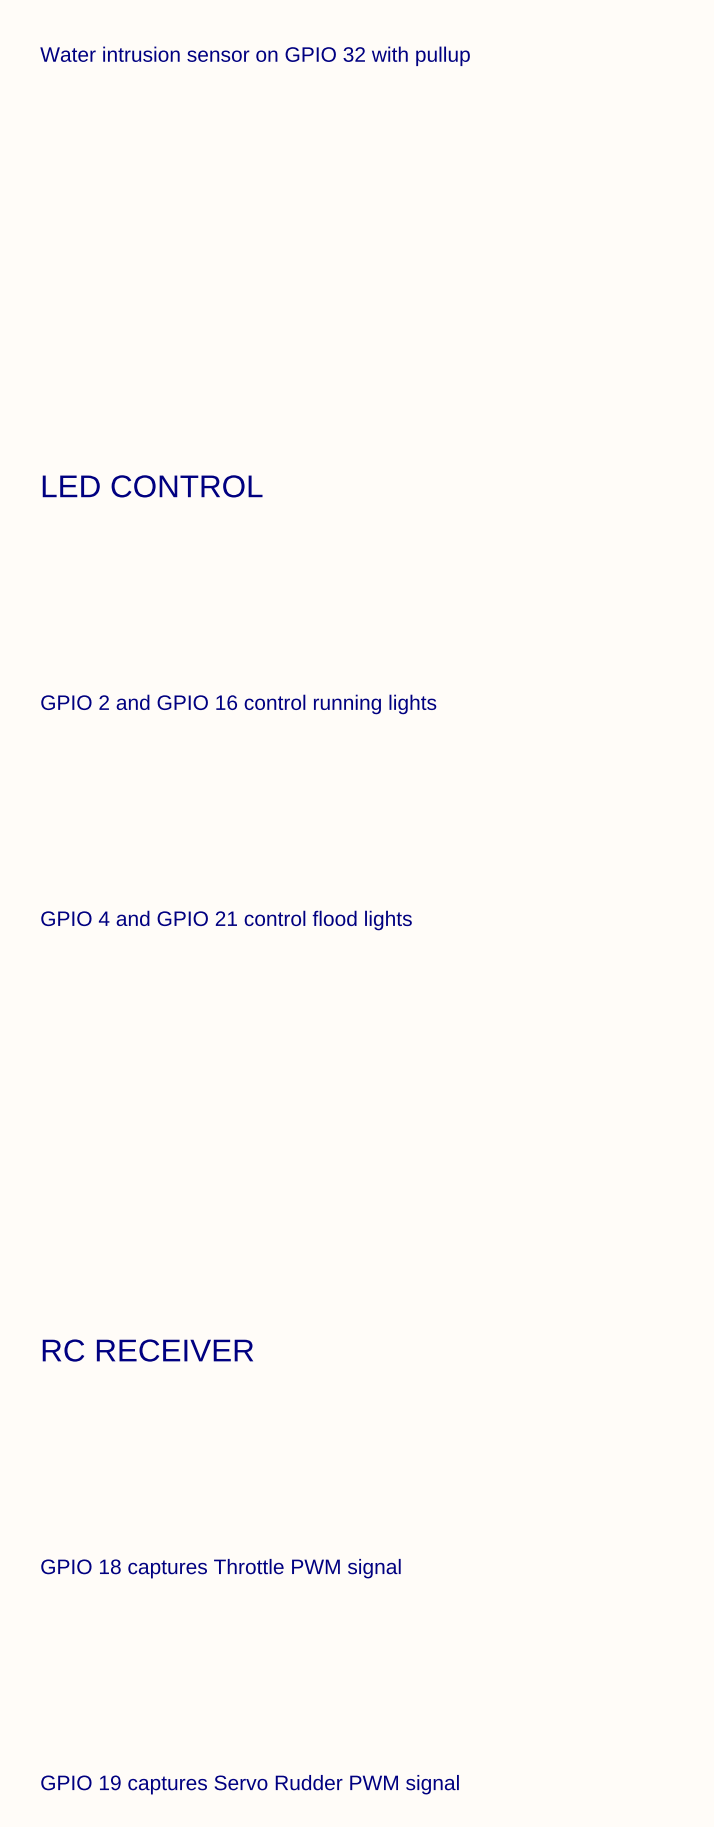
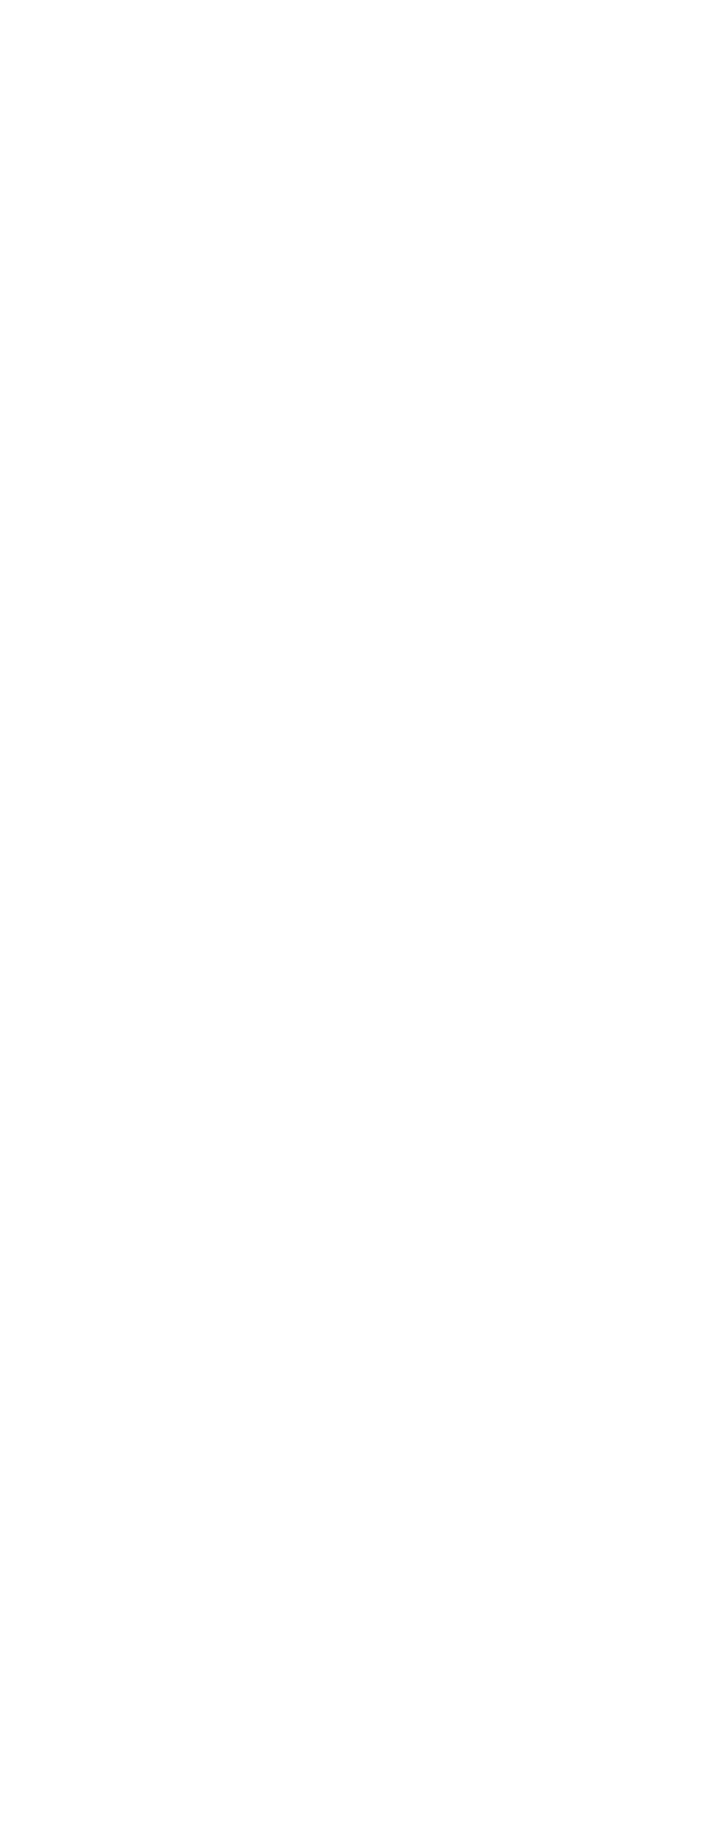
text: Water intrusion sensor on GPIO 32 with pullup (255, 56) -> none
text: LED CONTROL (152, 486) -> none
text: GPIO 2 and GPIO 16 control running lights (238, 704) -> none
text: GPIO 4 and GPIO 21 control flood lights (226, 920) -> none
text: RC RECEIVER (148, 1350) -> none
text: GPIO 18 captures Throttle PWM signal (220, 1568) -> none
text: GPIO 19 captures Servo Rudder PWM signal (250, 1784) -> none

